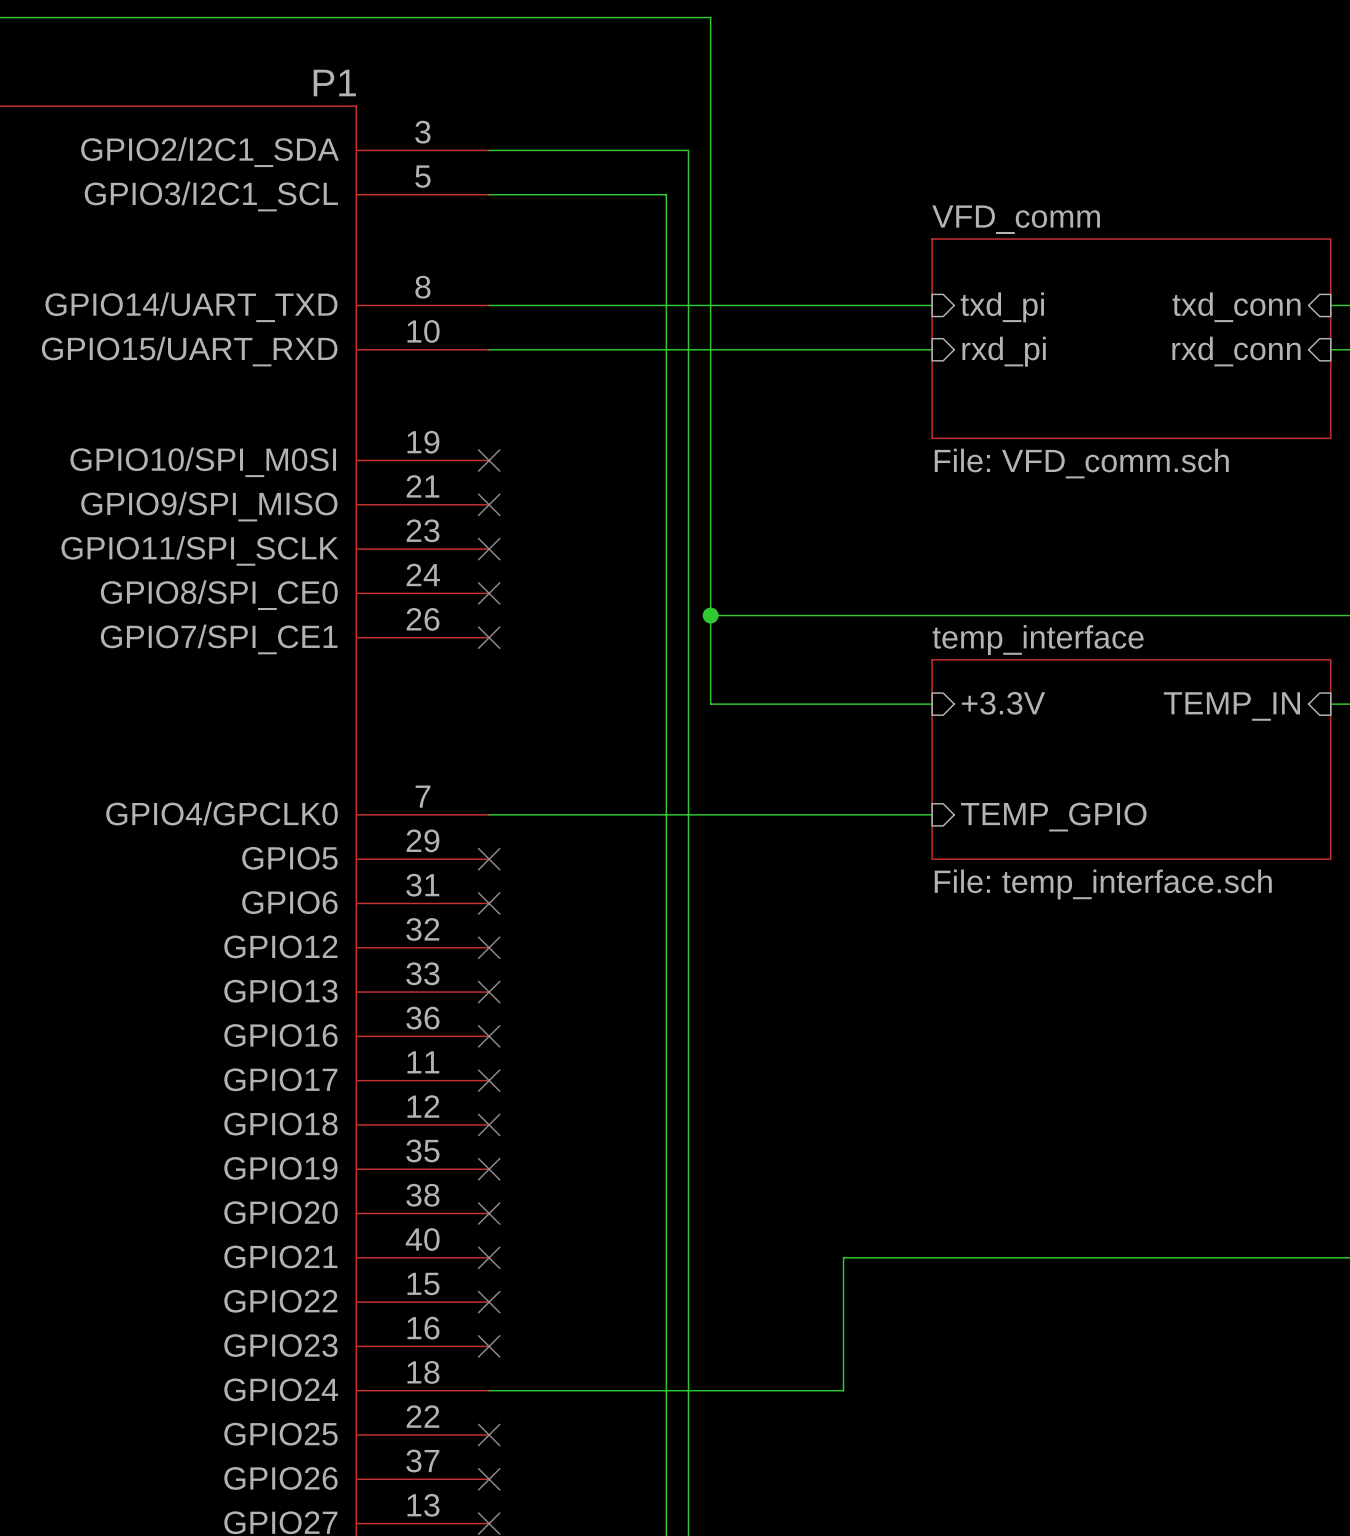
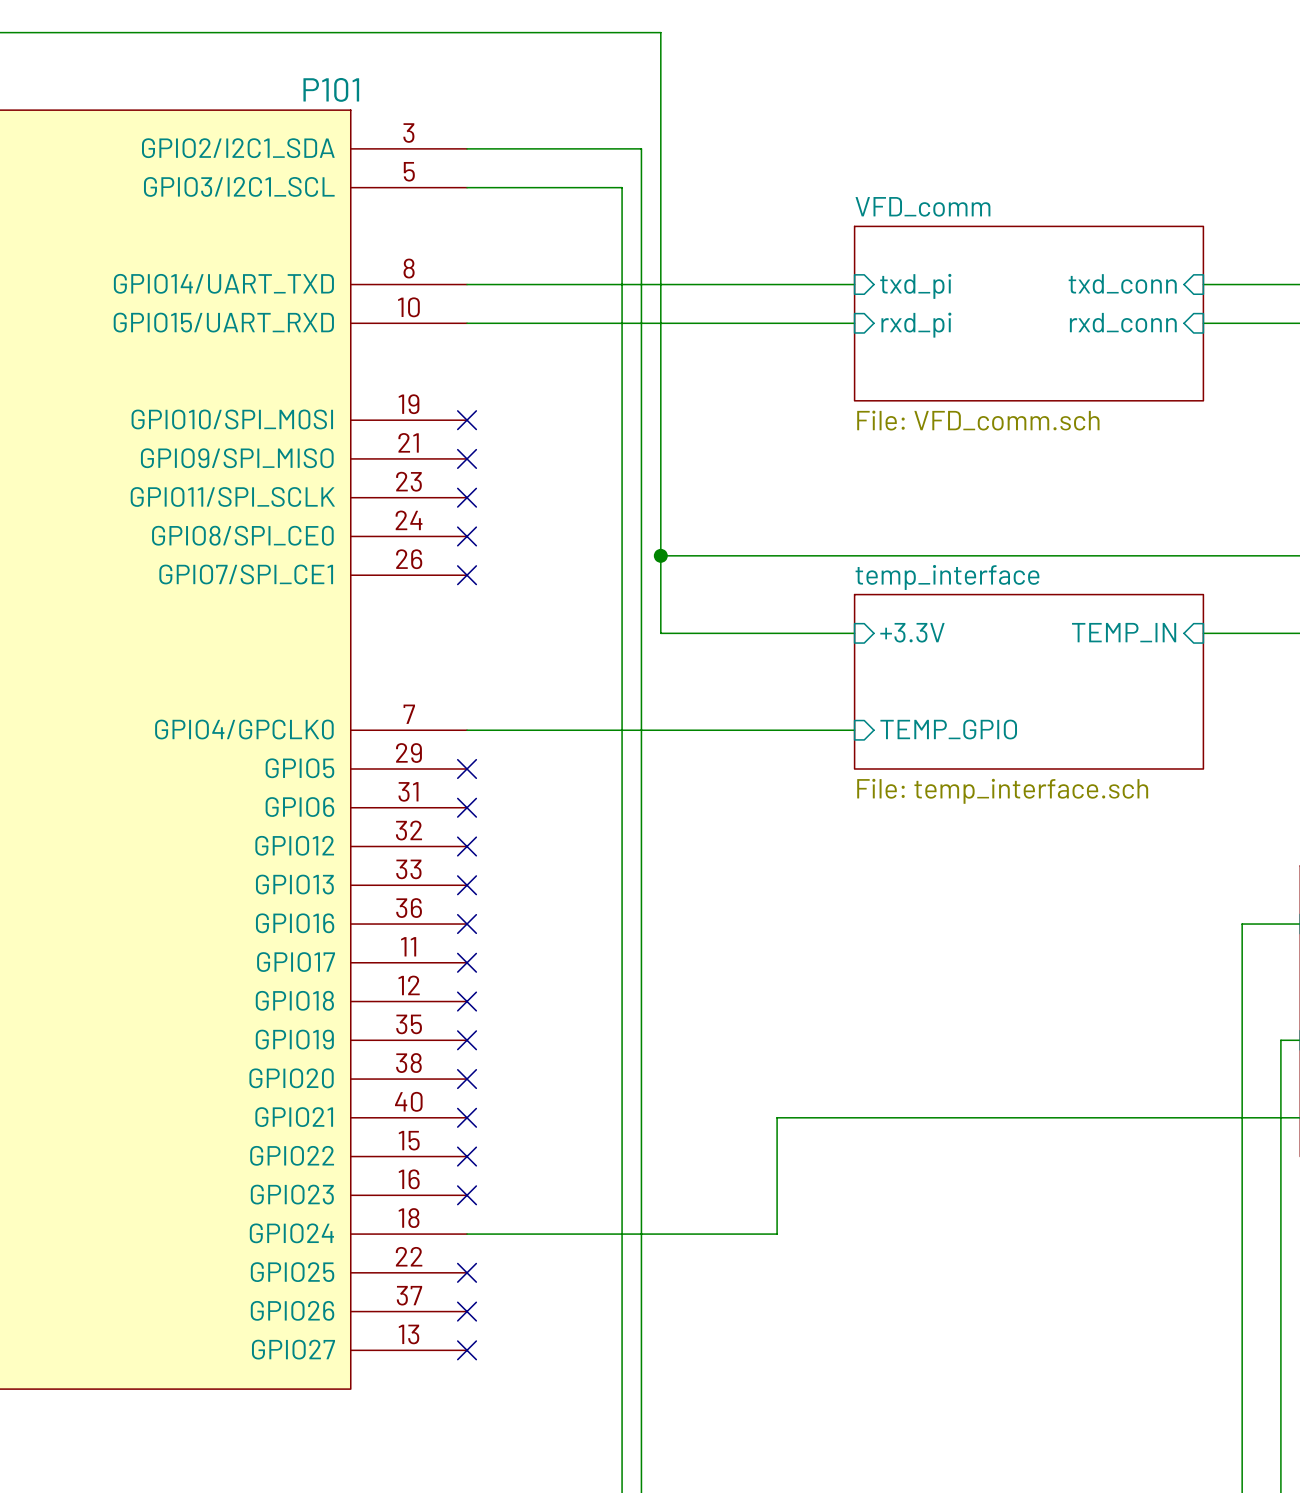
P1 name: P1 (334, 83) -> P101 (331, 89)

